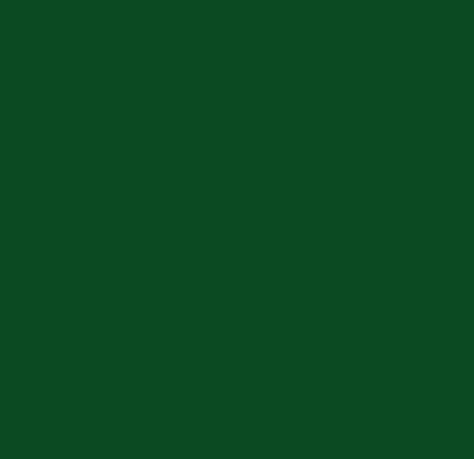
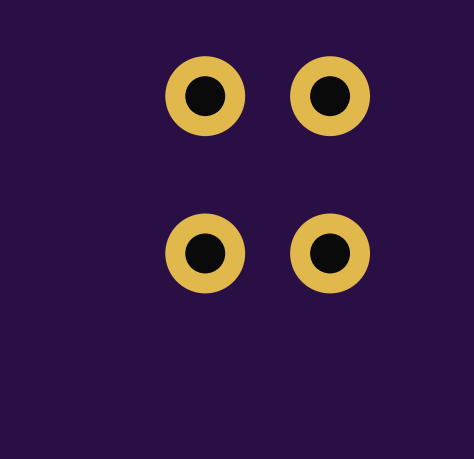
part: none -> (267, 96)
part: none -> (267, 253)

